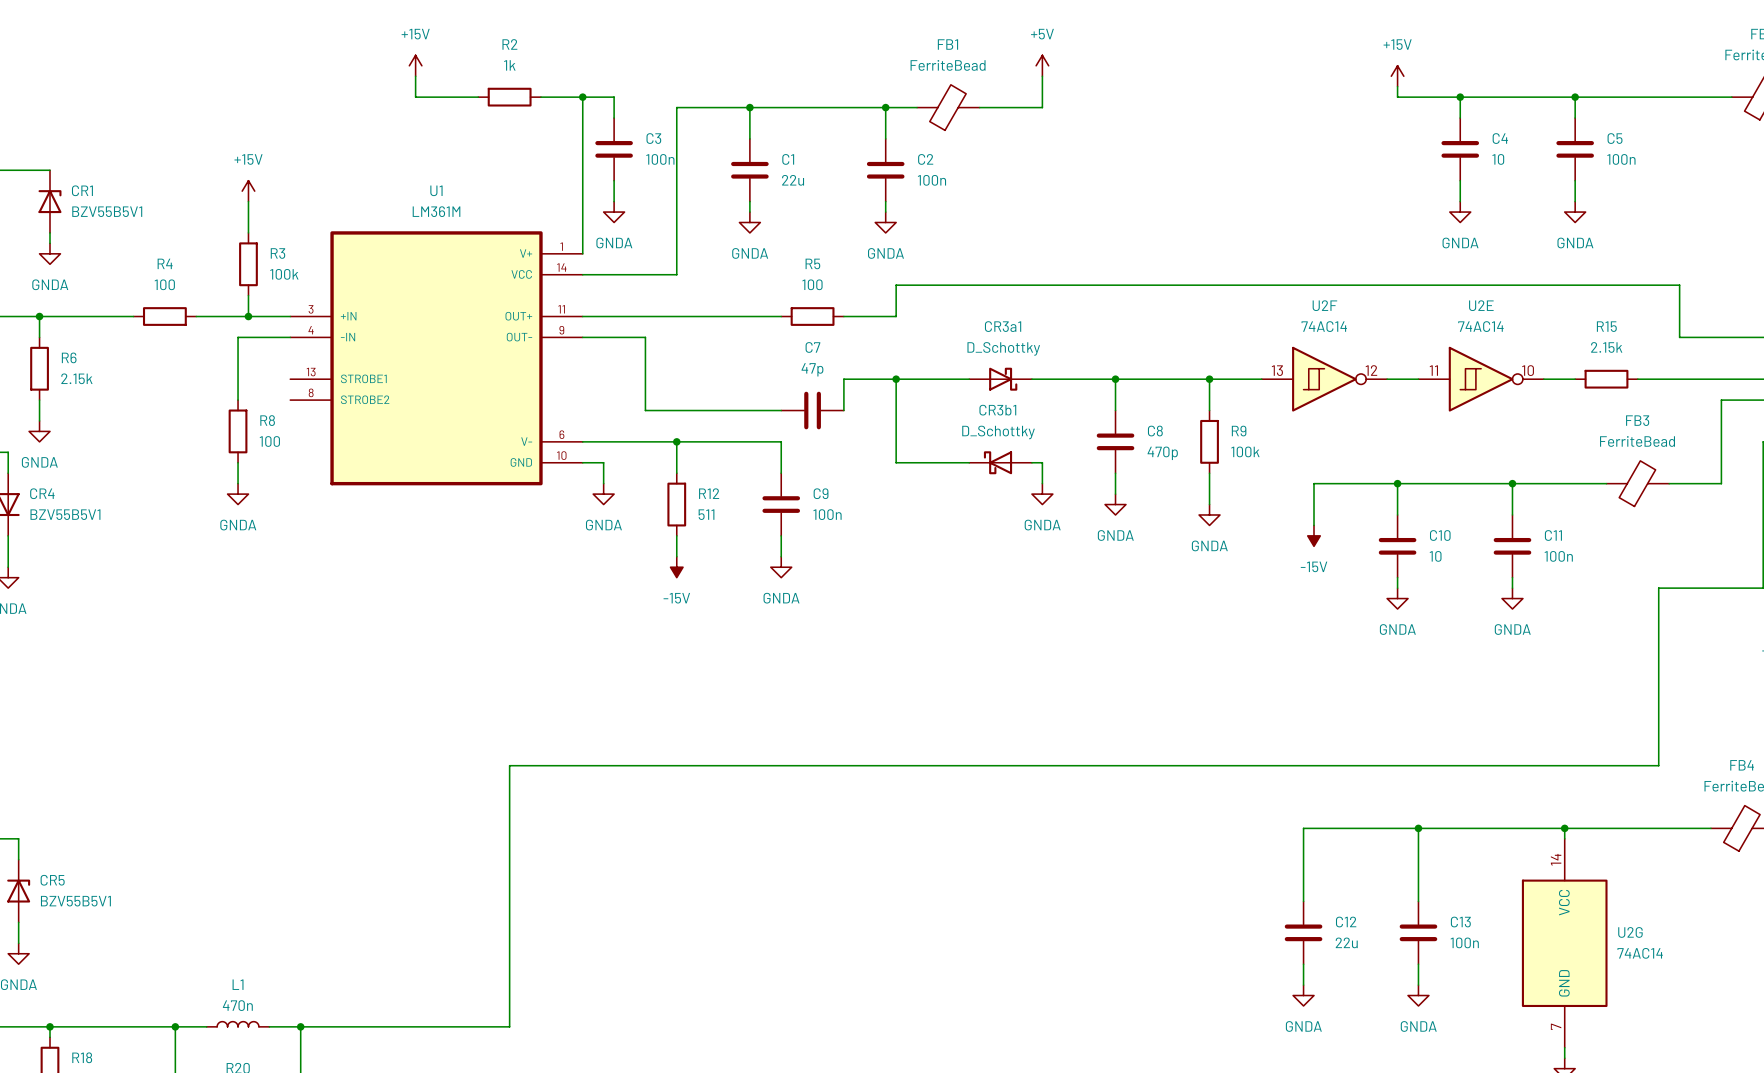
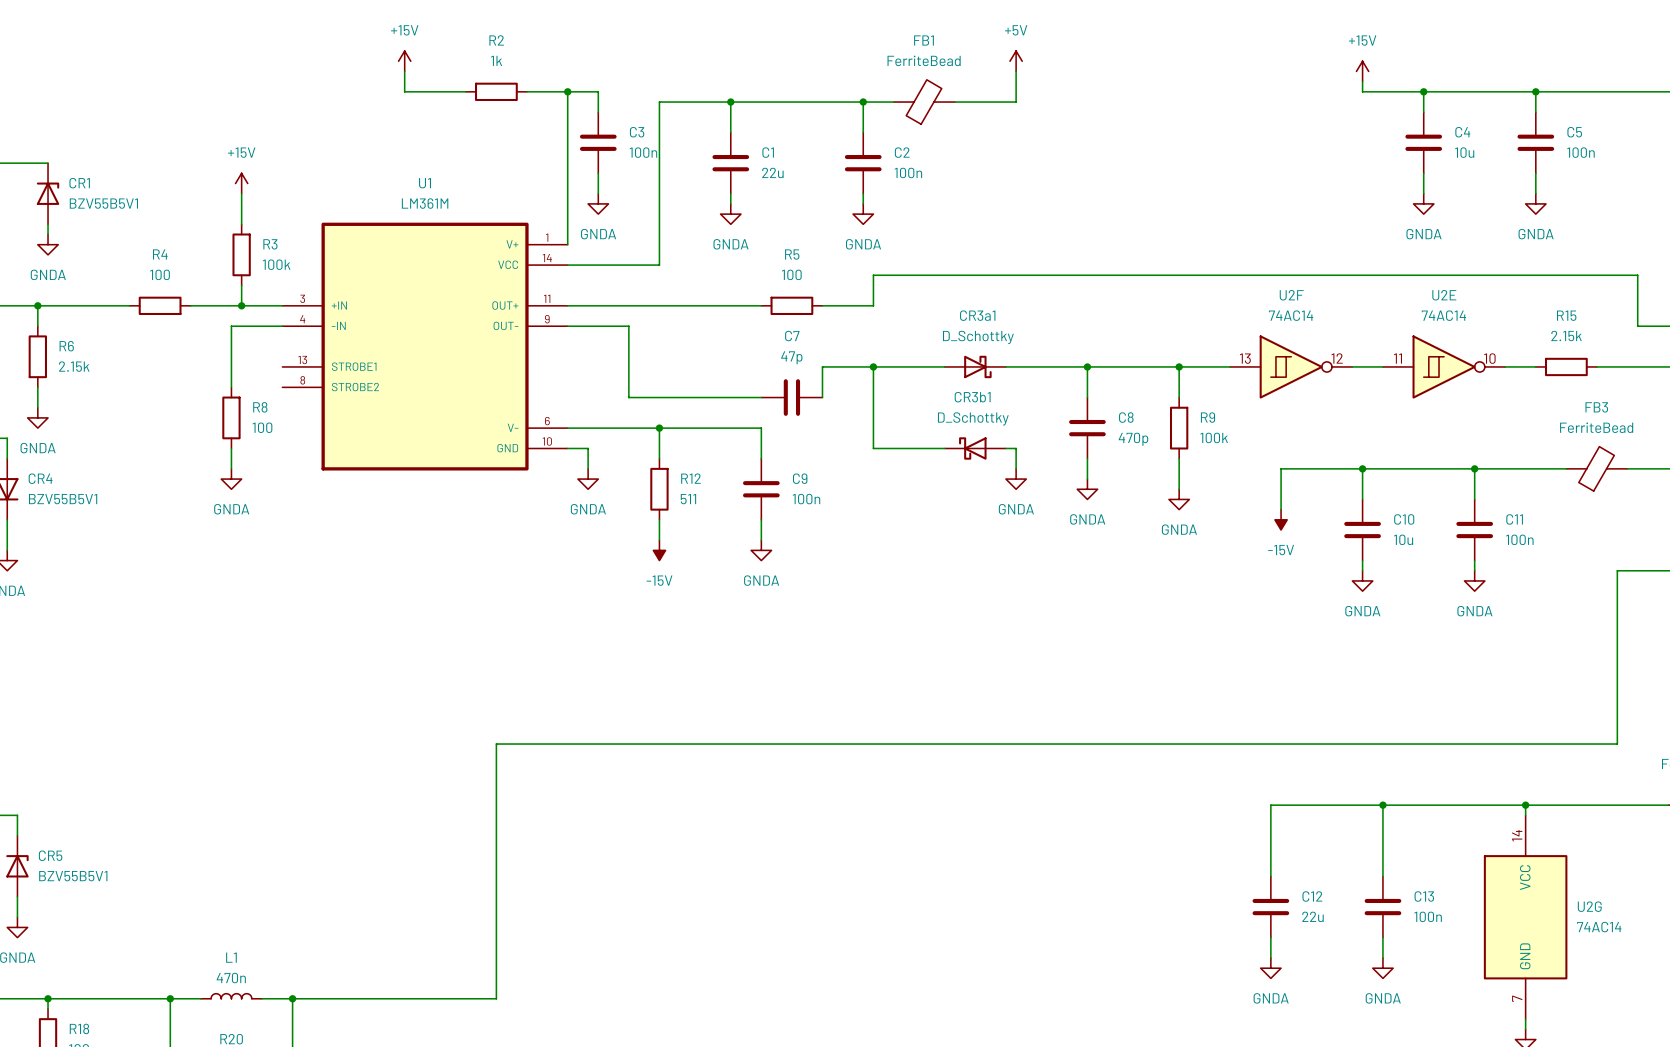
C4 value: 10 (1498, 159) -> 10u (1464, 152)
C10 value: 10 (1435, 556) -> 10u (1403, 539)

